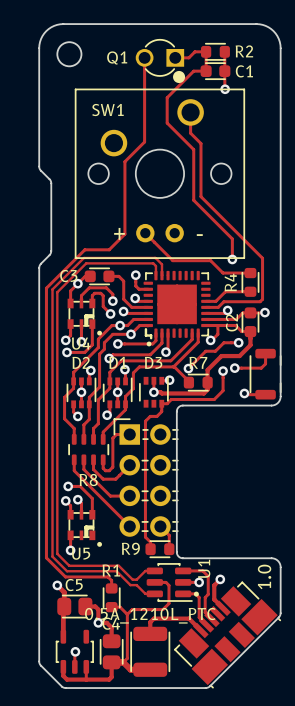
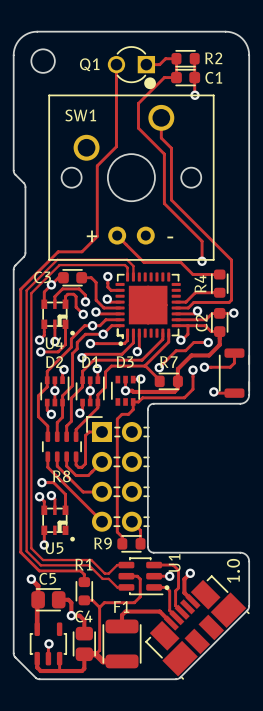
part value: 0.5A_1210L_PTC (150, 615) -> F1 (121, 606)

